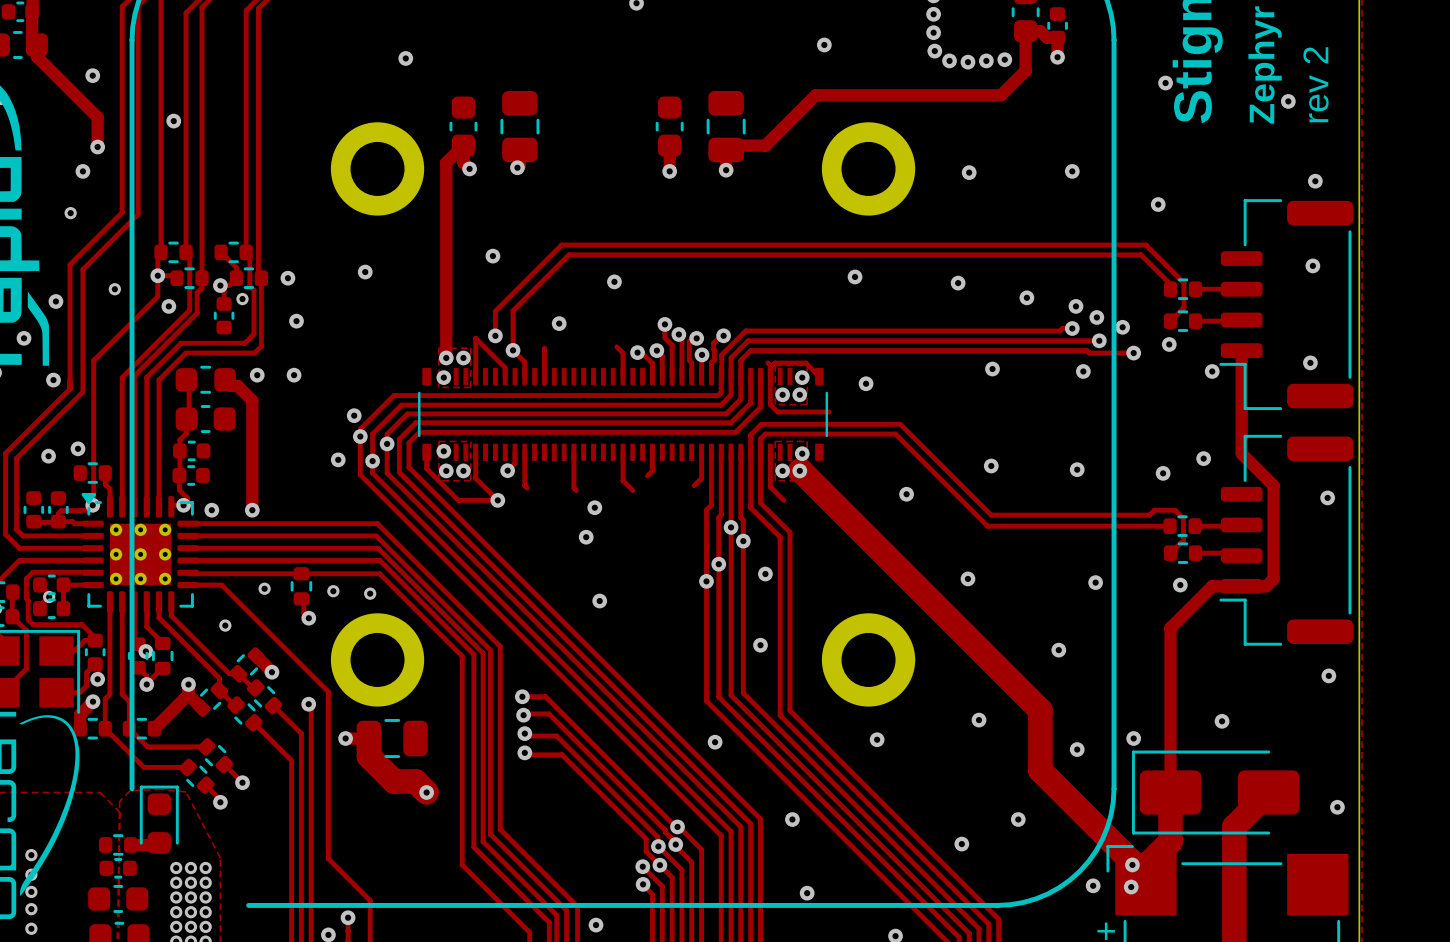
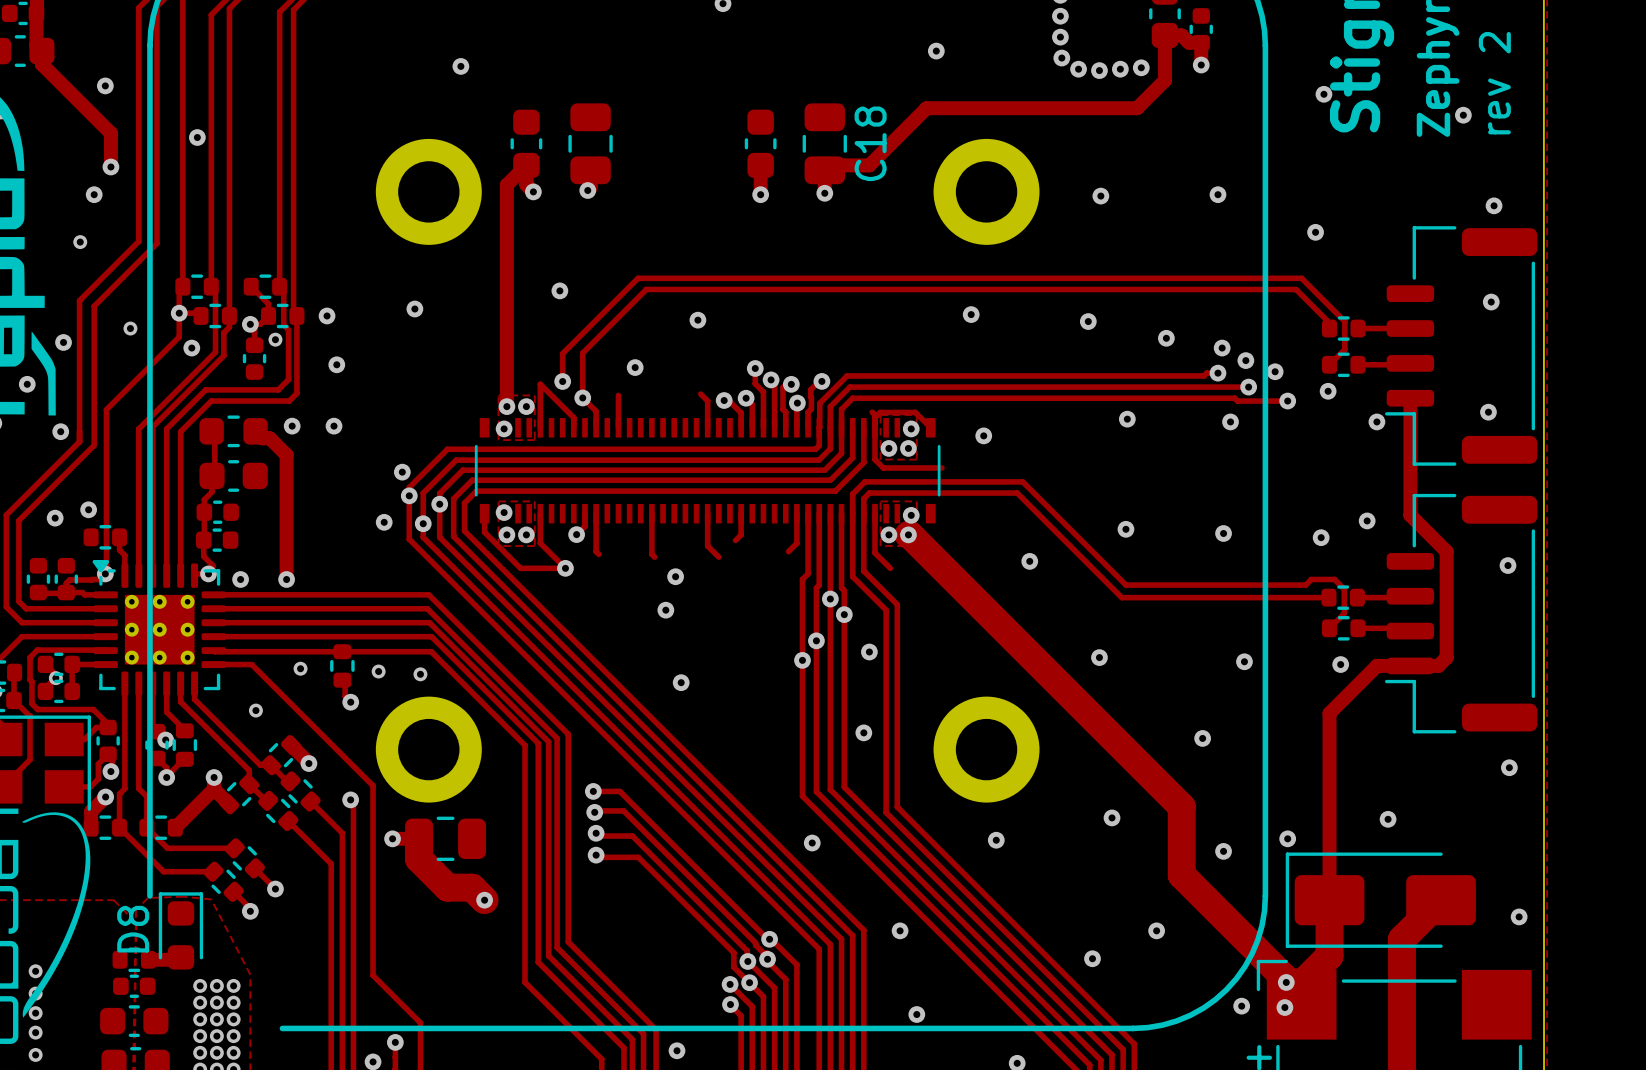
C18 name: none -> C18 (870, 143)
D8 name: none -> D8 (133, 929)

